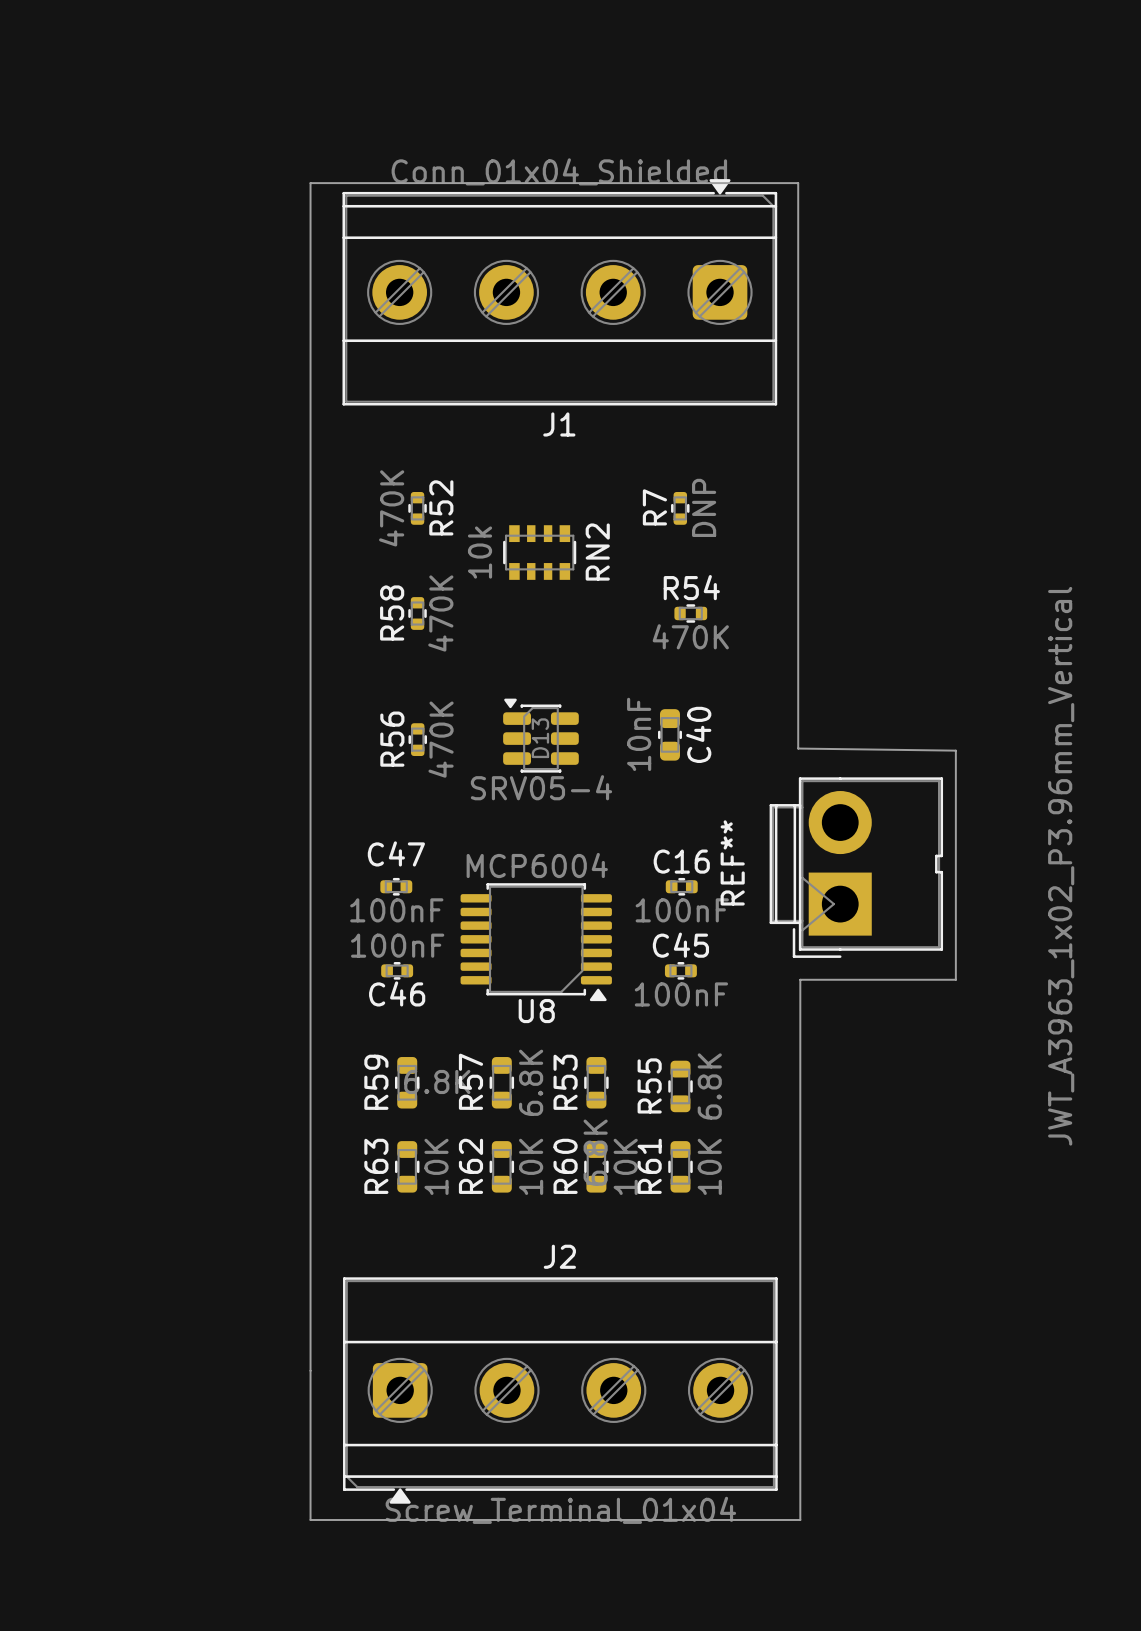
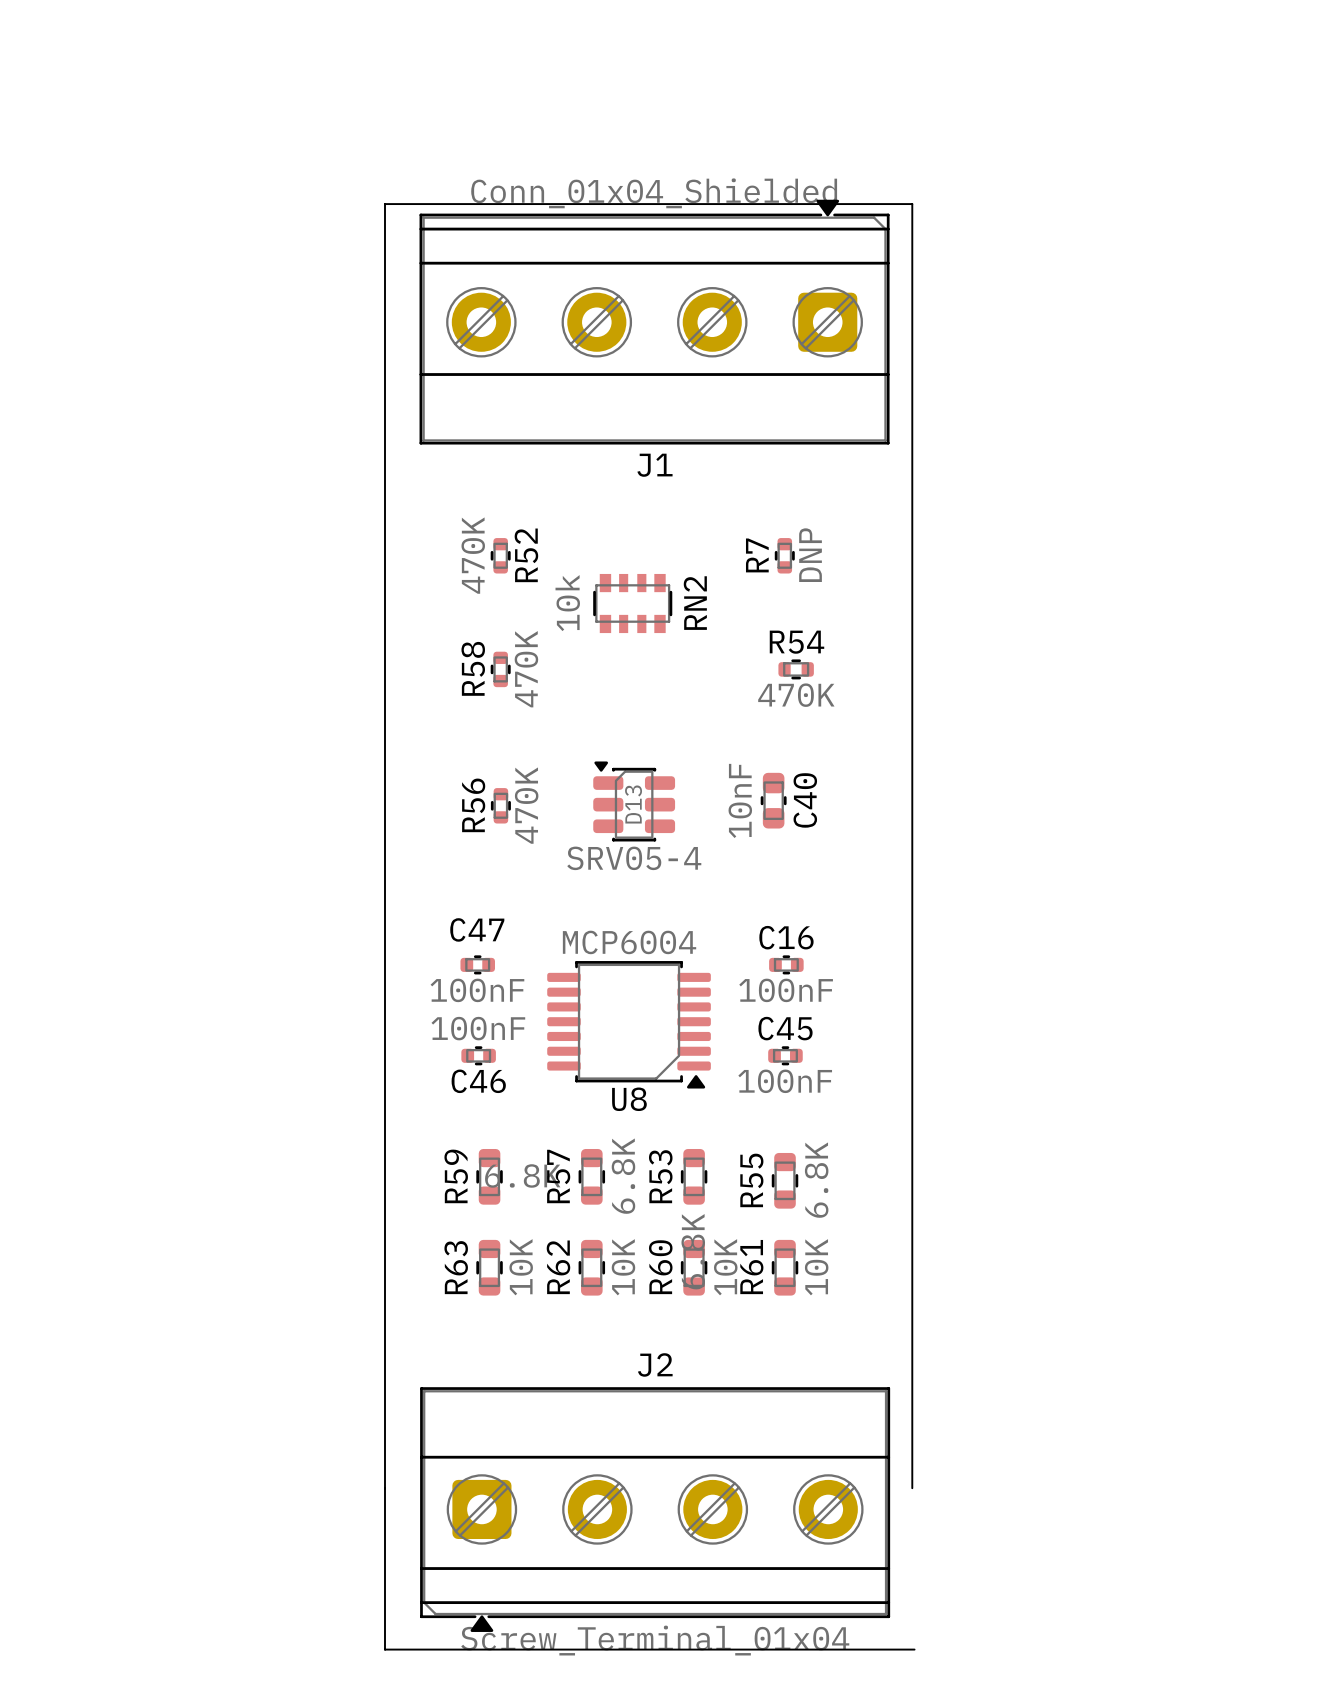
board edge: (798, 748) (955, 750) (955, 979) (800, 979) (800, 1519) -> (912, 815) (912, 1488)
REF**: JWT_A3963_1x02_P3.96mm_Vertical (856, 867) -> none

